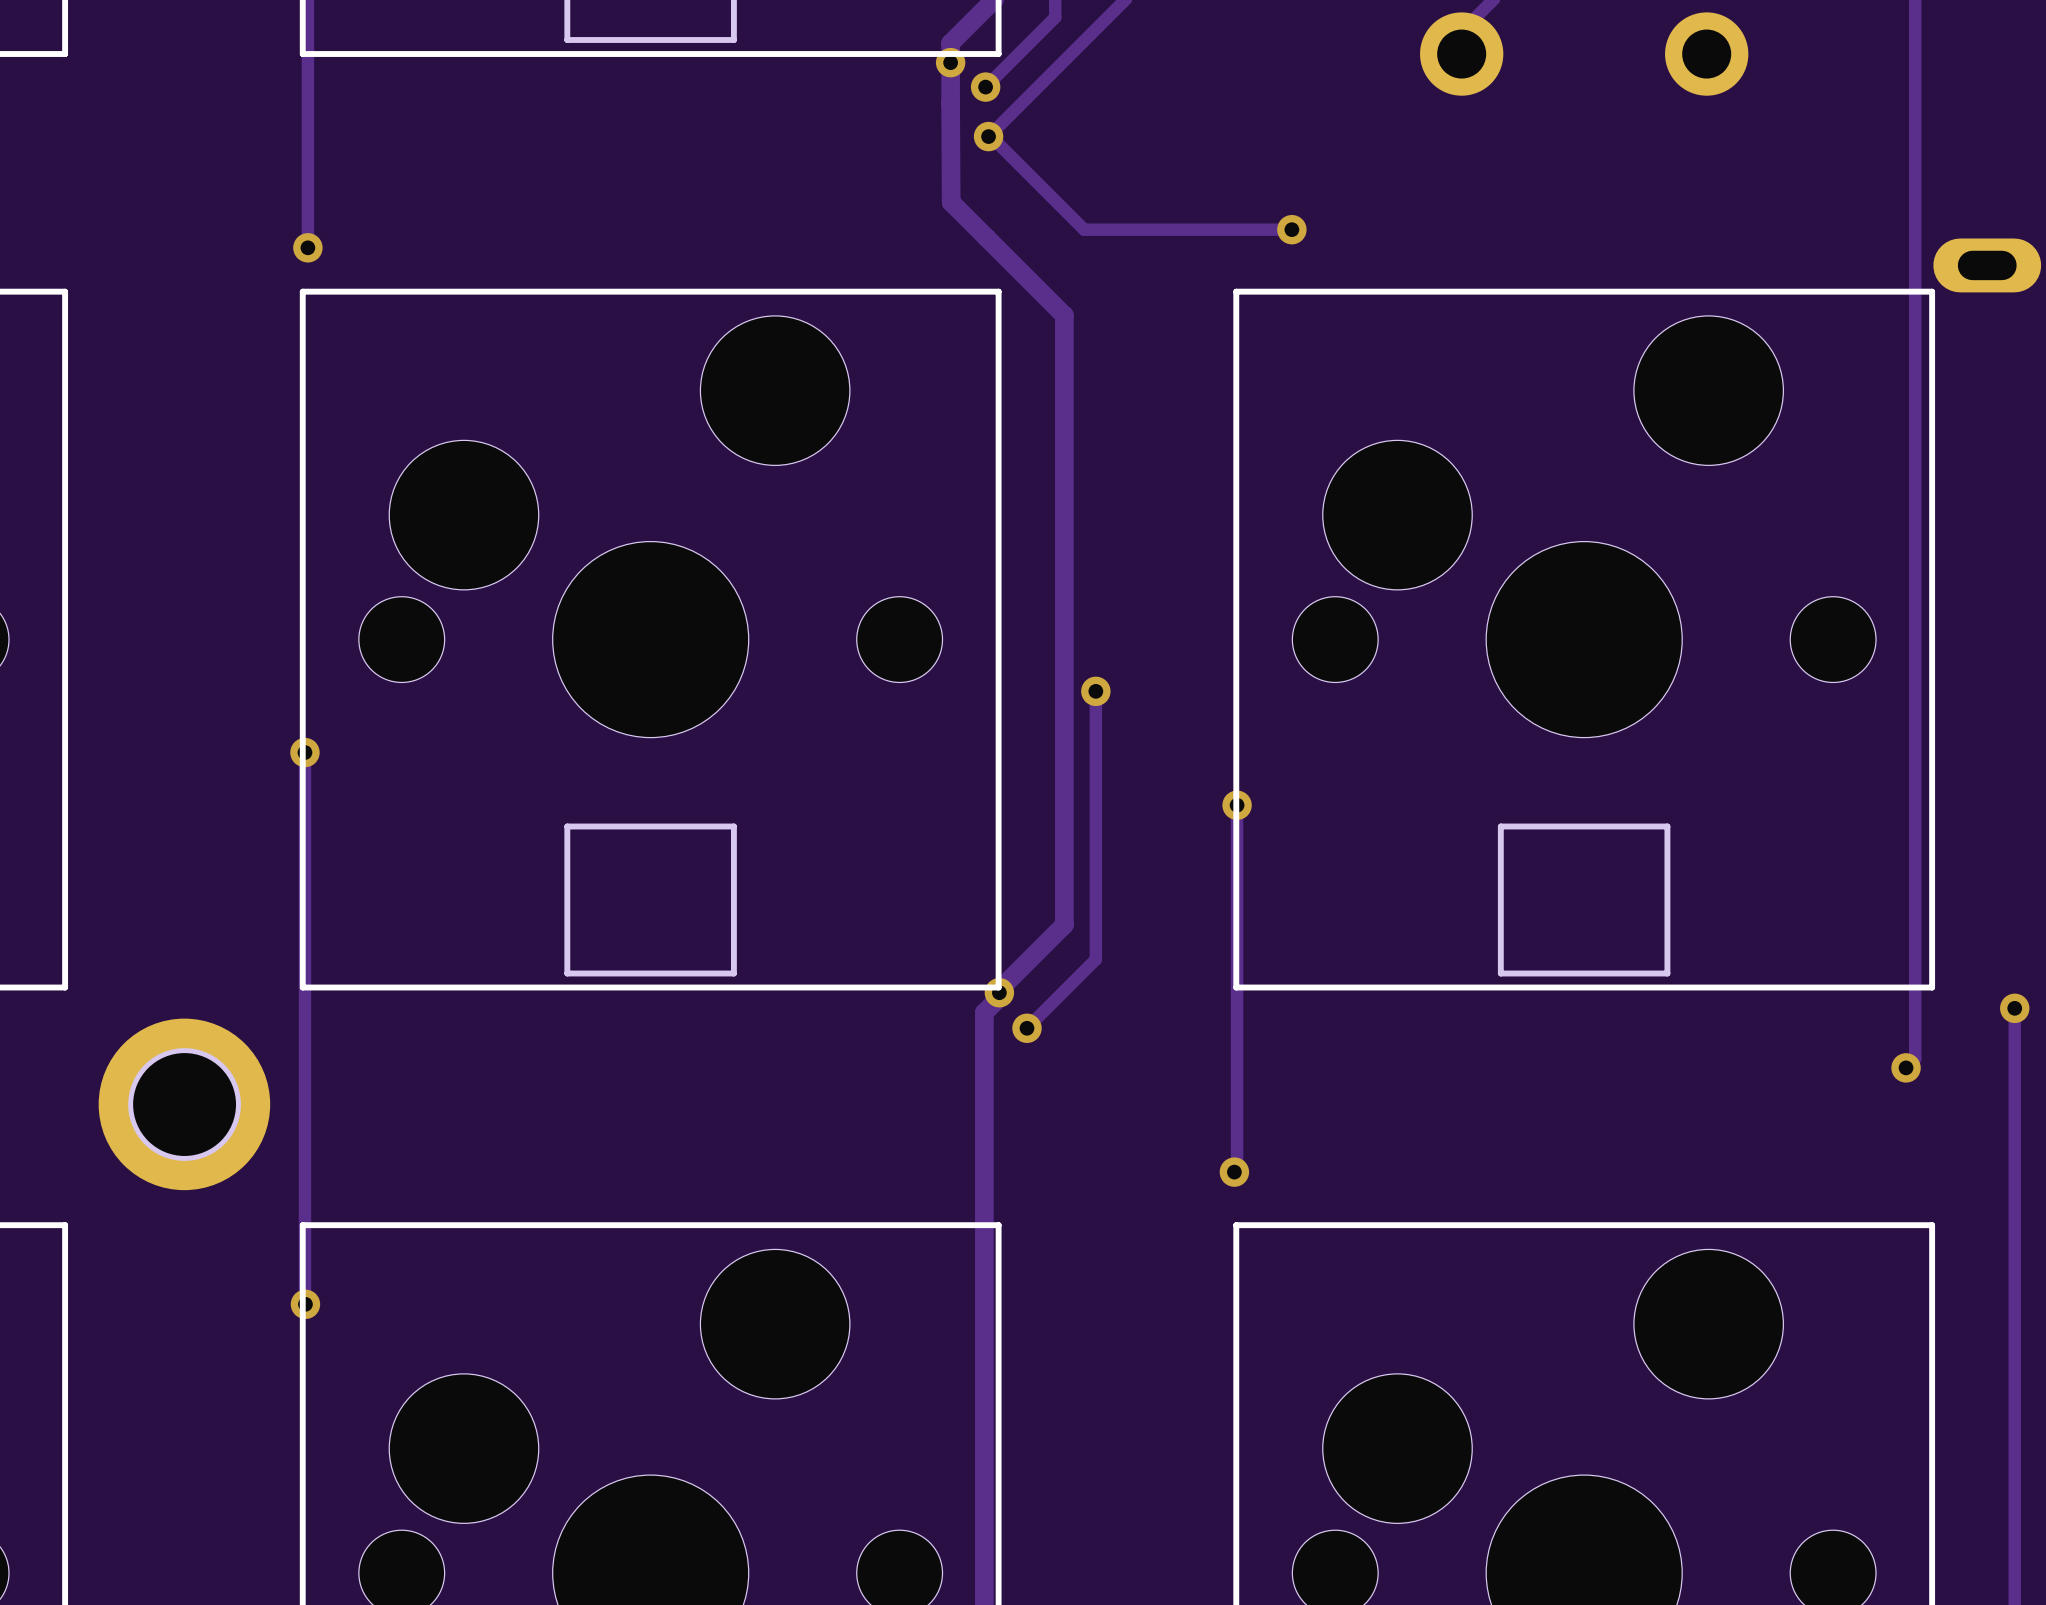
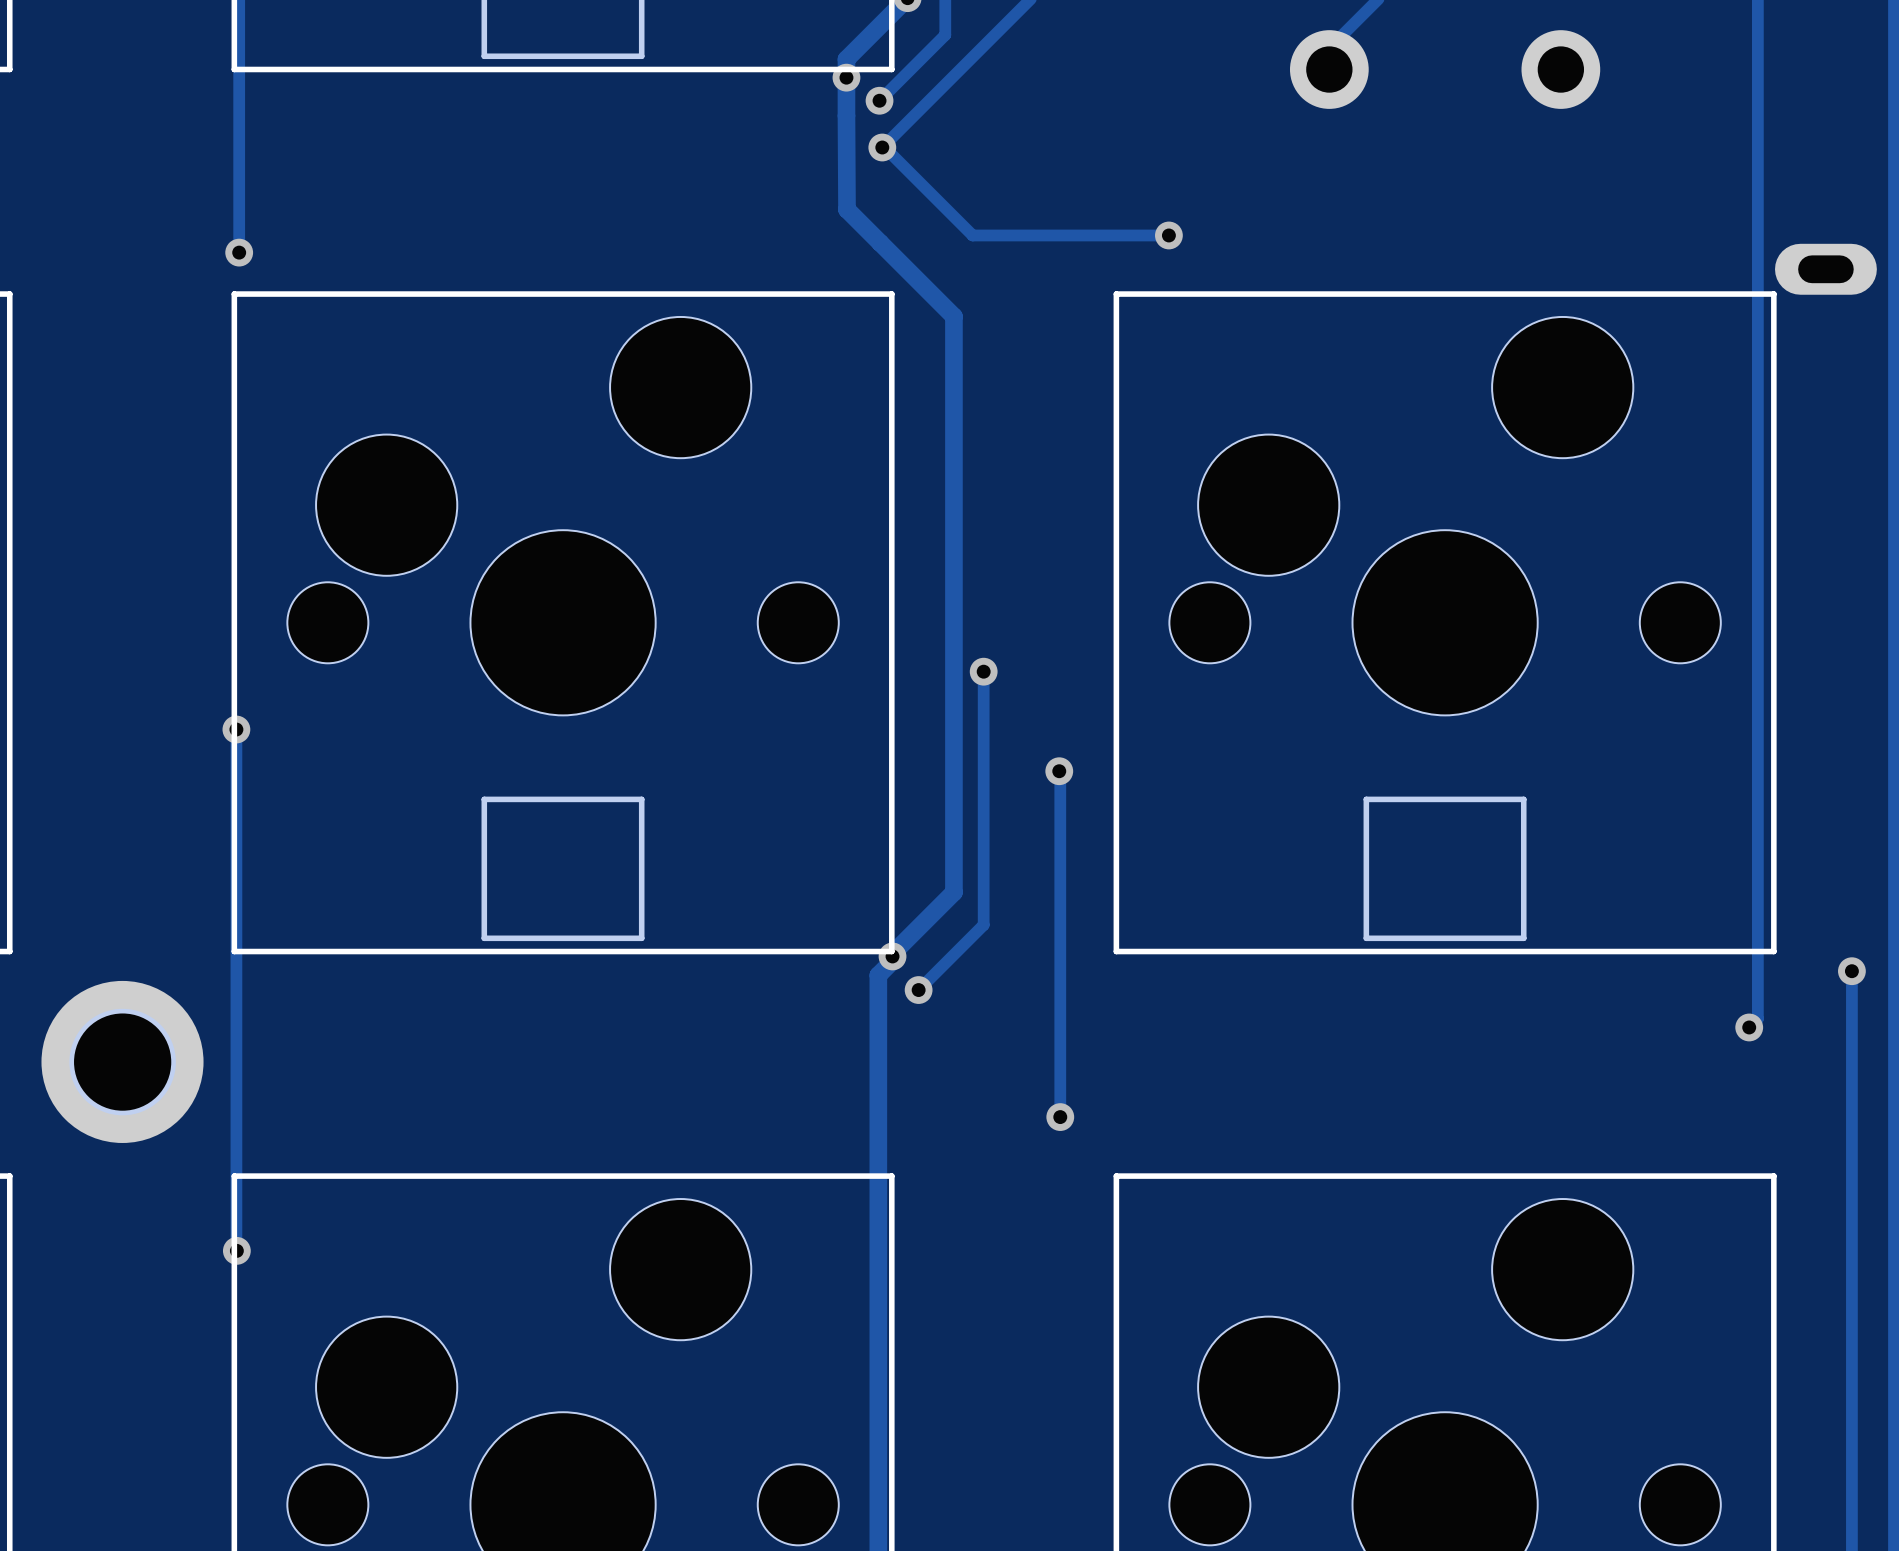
track: none -> (1059, 771) (1060, 1117)
track: (1237, 805) (1237, 1169) (1234, 1172) -> none
via position: (1237, 805) -> (1059, 771)
via position: (1234, 1172) -> (1060, 1117)

